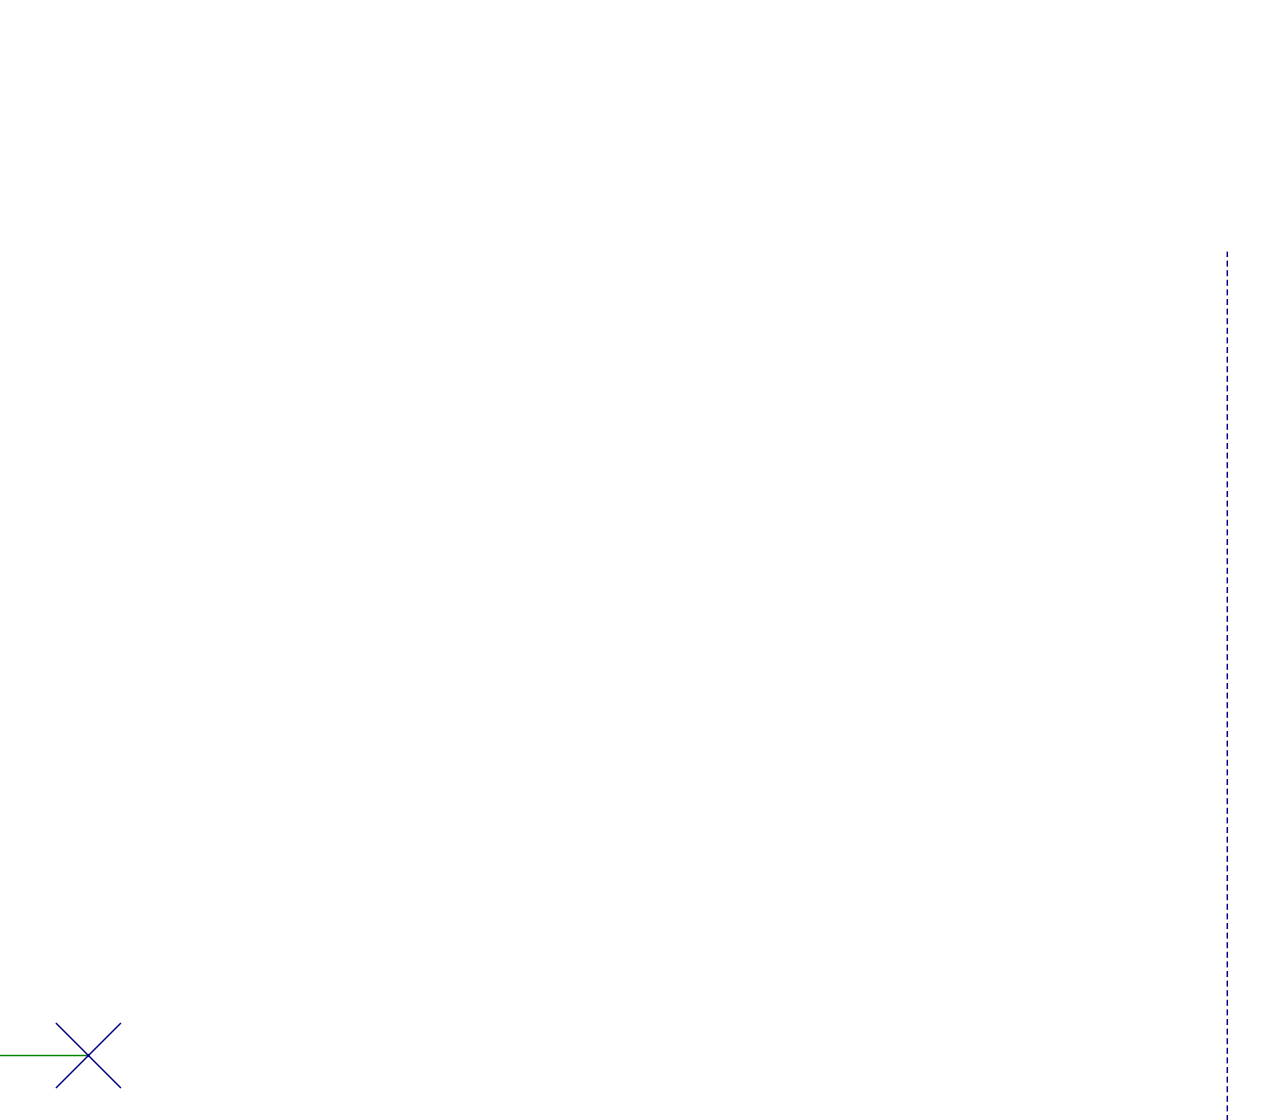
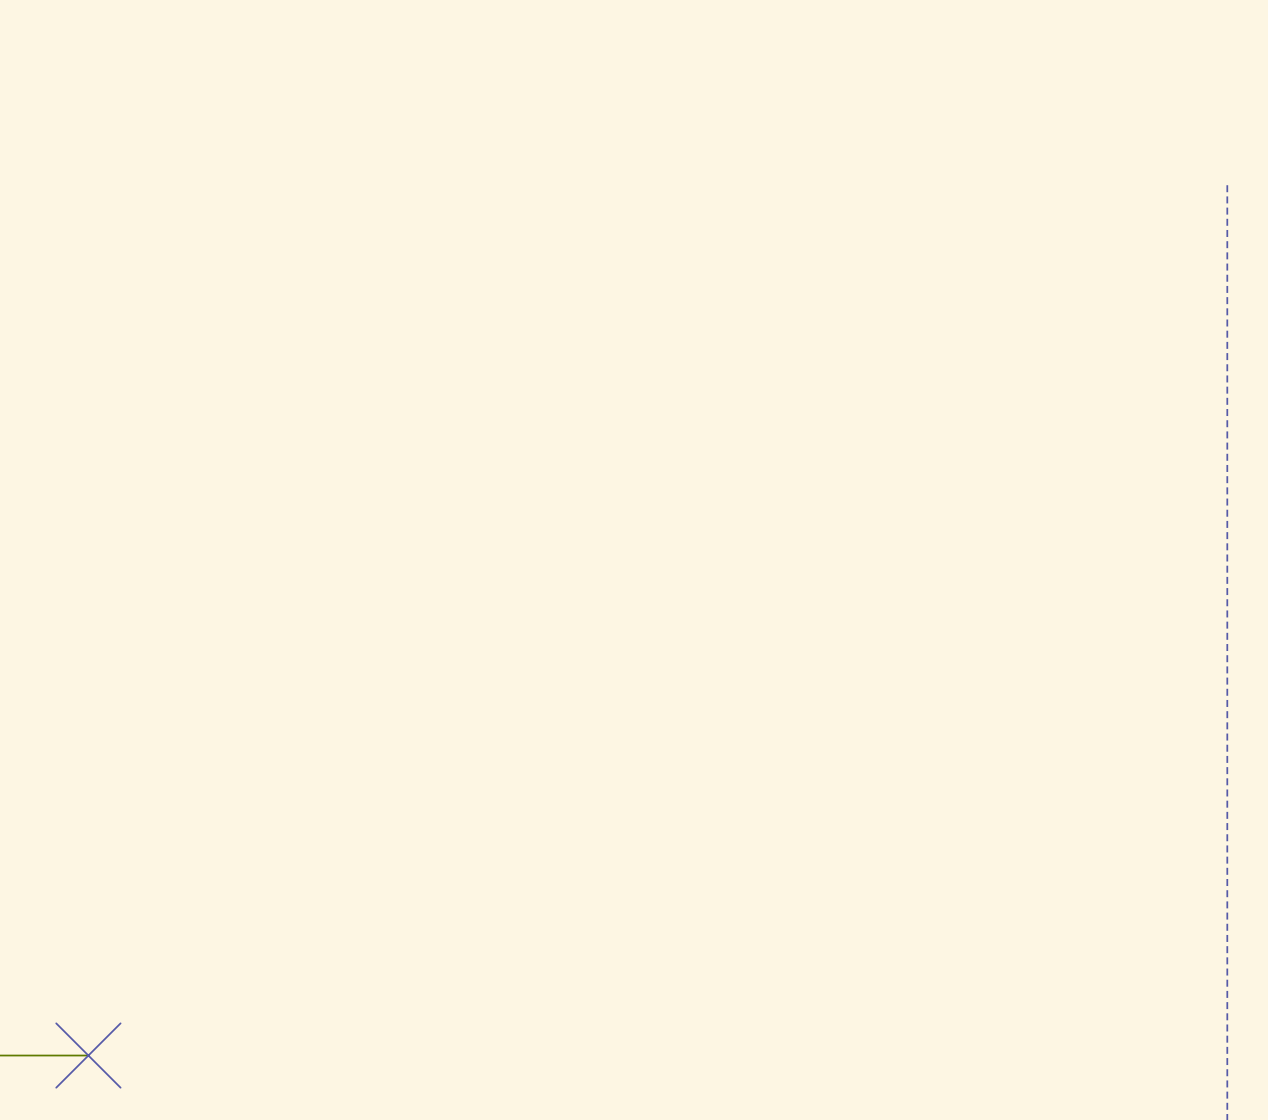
line: none -> (1227, 184) (1227, 251)

